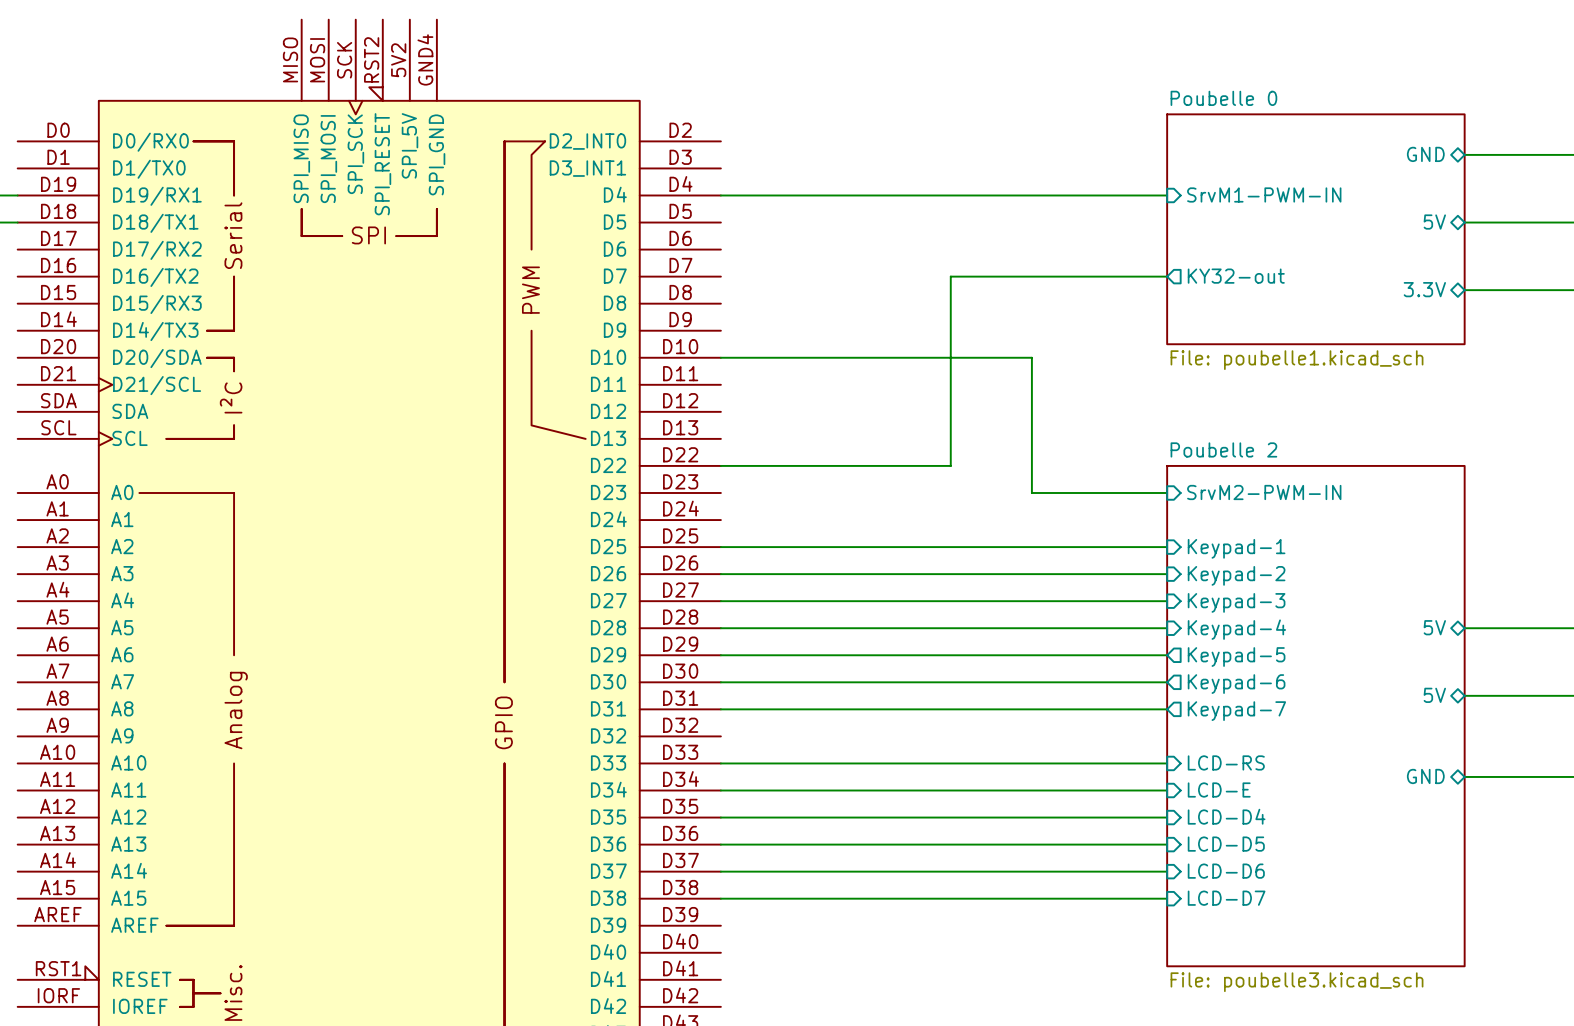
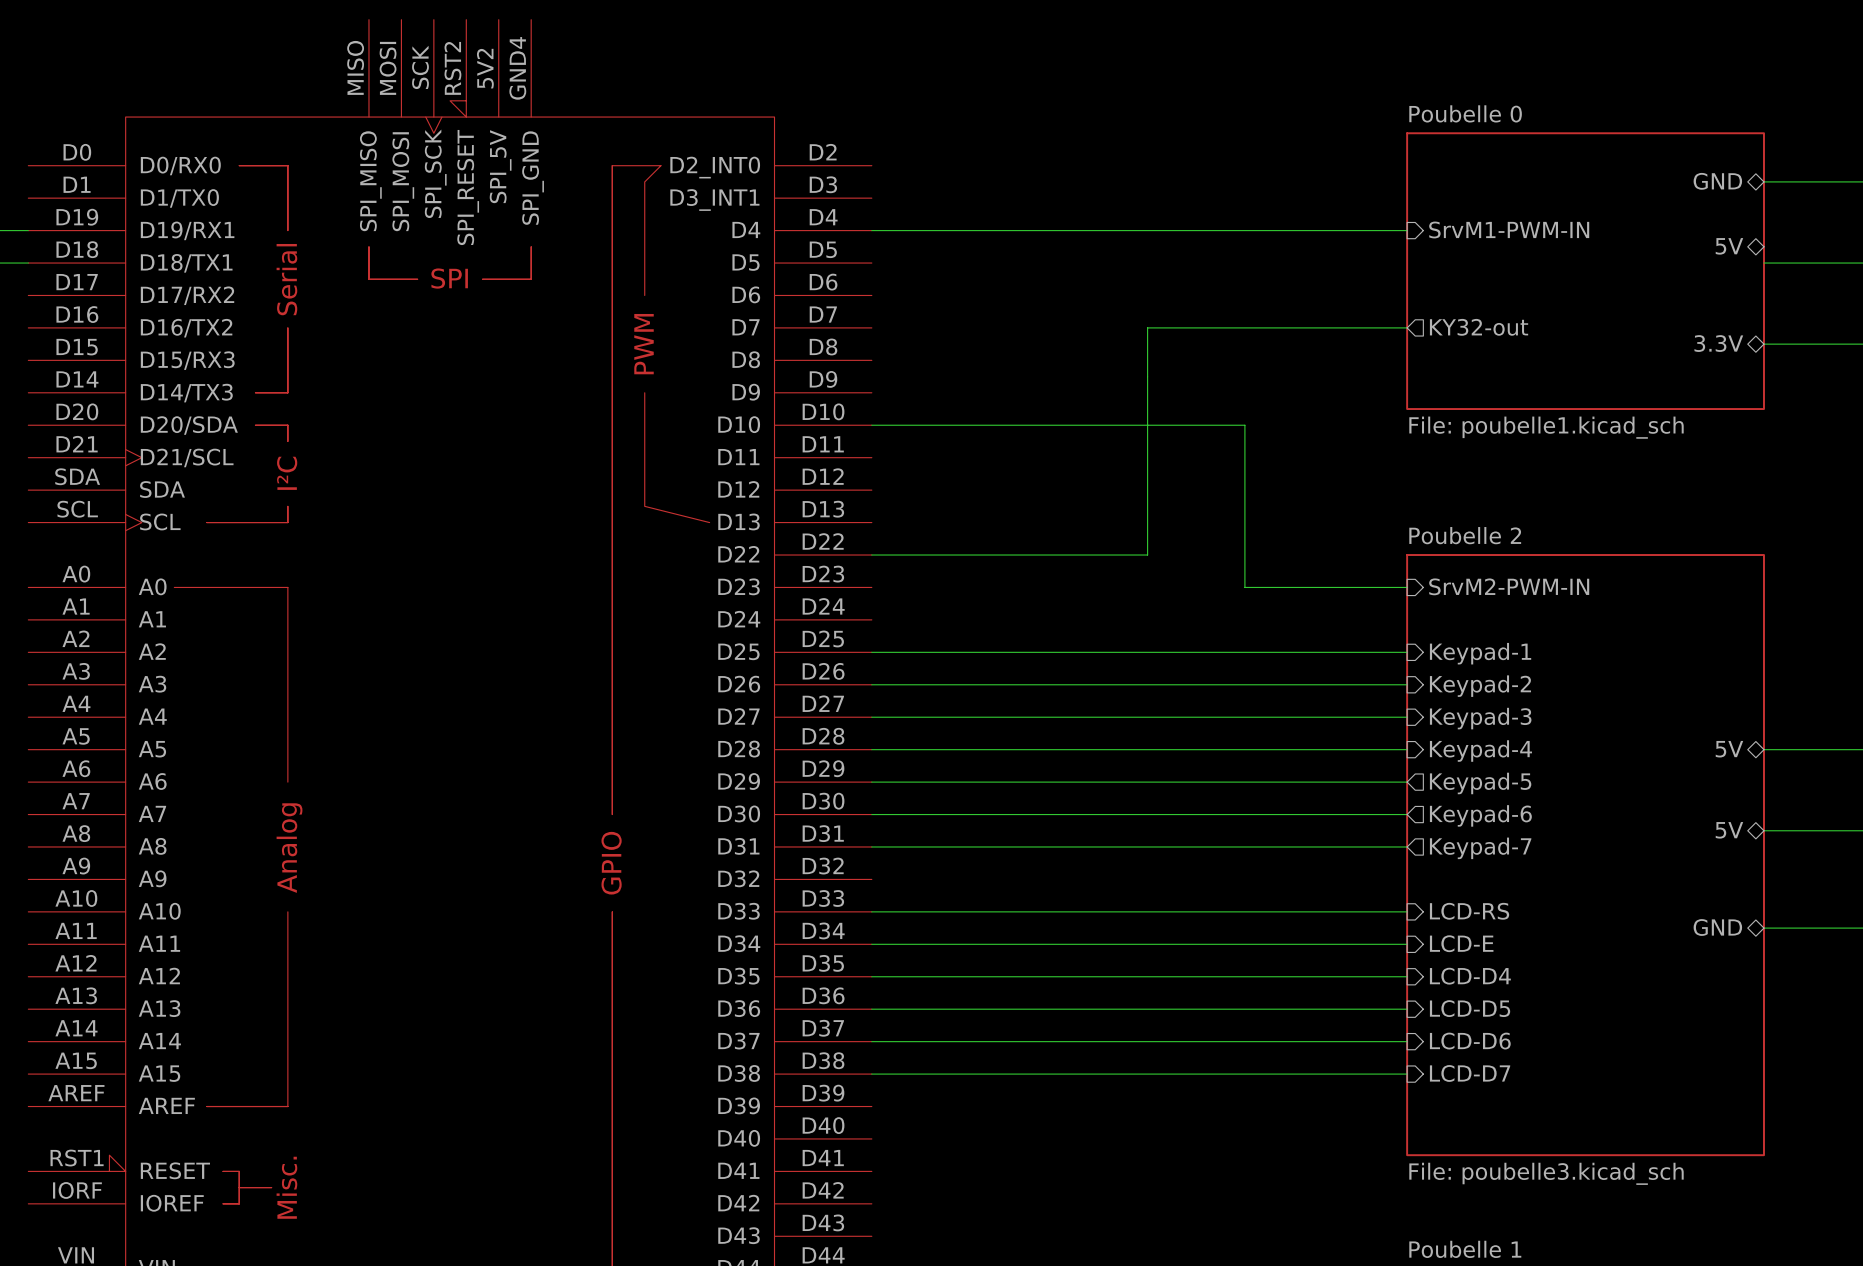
sheet pin position: 5V (1434, 222) -> 5V (1729, 246)

